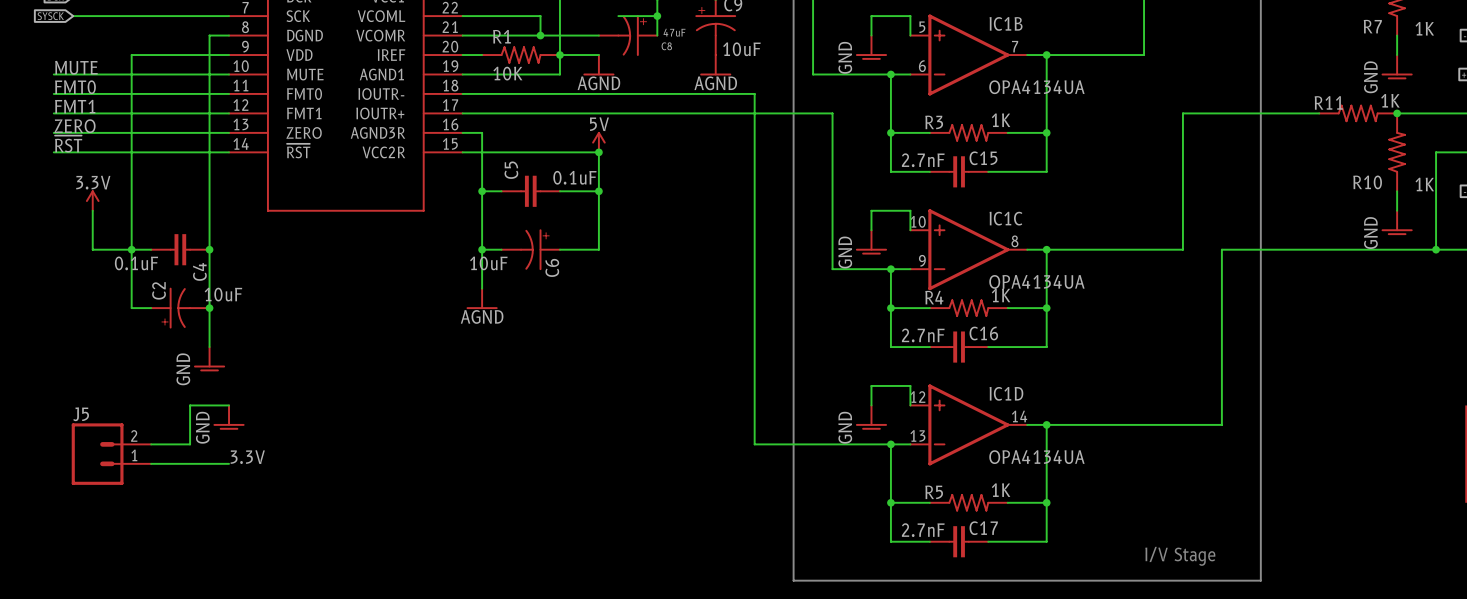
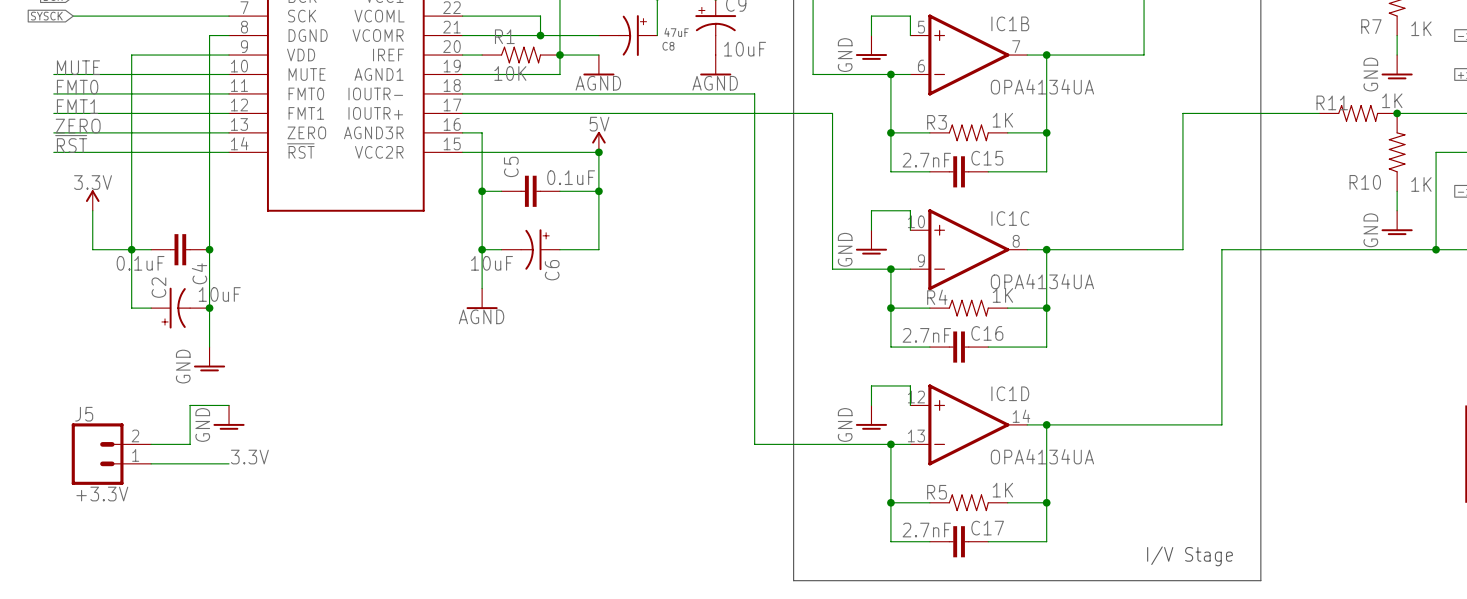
wire: (618, 16) (657, 16) -> none
junction: (657, 16) -> none
J5 value: none -> +3.3V (102, 494)

